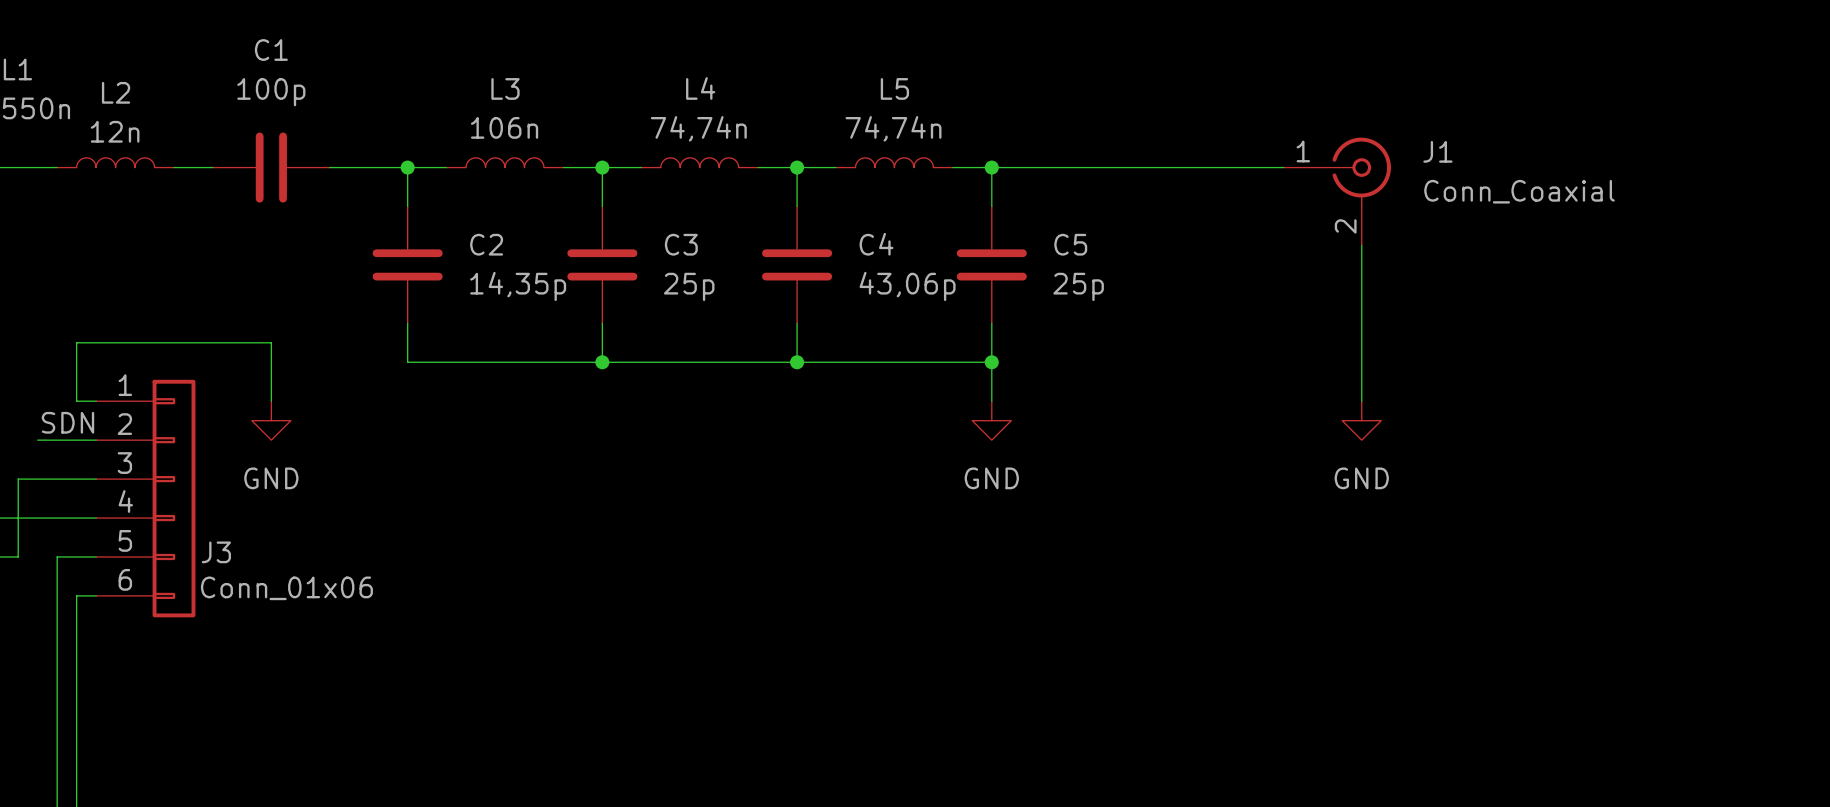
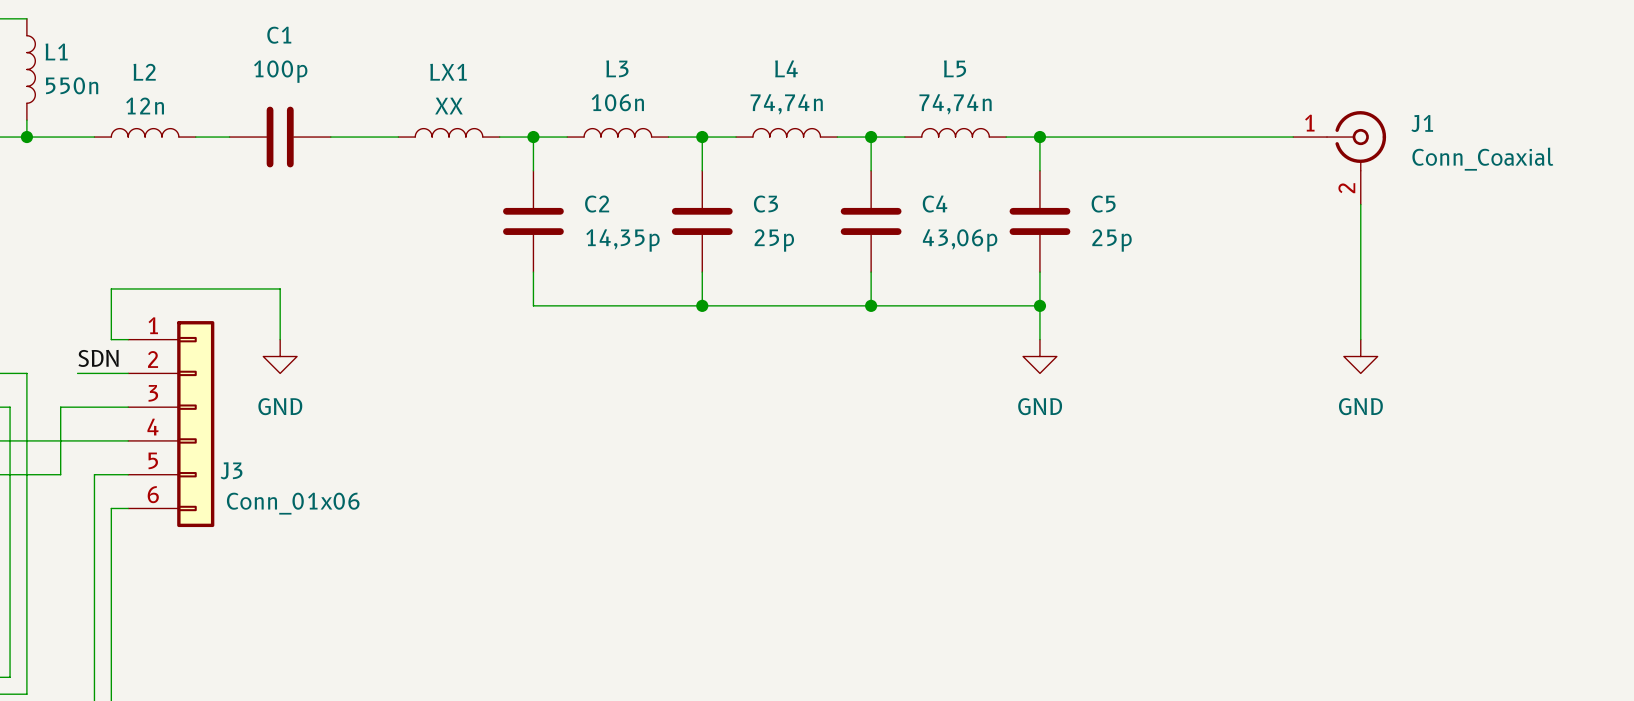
LX1: none -> XX (449, 132)
L3 position: (505, 162) -> (617, 132)
L4 position: (699, 162) -> (786, 132)
L5 position: (894, 162) -> (955, 132)
junction: (407, 167) -> none
wire: (446, 167) (407, 167) (407, 206) -> none
wire: none -> (499, 137) (533, 137) (533, 170)
junction position: (602, 167) -> (533, 137)
wire: (641, 167) (602, 167) (602, 206) -> none
wire: none -> (668, 137) (702, 137) (702, 170)
junction position: (797, 167) -> (702, 137)
wire: (836, 167) (797, 167) (797, 206) -> none
wire: none -> (837, 137) (871, 137) (871, 170)
junction position: (991, 167) -> (871, 137)
wire: (1108, 167) (991, 167) (991, 206) -> none
wire: none -> (1039, 137) (1039, 170)
junction: none -> (1039, 137)
wire: none -> (1158, 137) (1293, 137)
J1 position: (1337, 191) -> (1339, 157)
wire: (1361, 245) (1361, 401) -> (1360, 204) (1360, 339)
C2 position: (407, 264) -> (533, 221)
C3 position: (602, 264) -> (702, 221)
C4 position: (797, 264) -> (871, 221)
C5 position: (991, 264) -> (1039, 221)
wire: (407, 323) (407, 362) (563, 362) -> (533, 272) (533, 305)
wire: (602, 323) (602, 362) -> (702, 272) (702, 305)
wire: (797, 323) (797, 362) -> (871, 272) (871, 305)
wire: (991, 323) (991, 401) -> (1039, 272) (1039, 339)
junction: (602, 362) -> none
junction position: (797, 362) -> (702, 305)
wire: none -> (904, 305) (1039, 305)
junction position: (991, 362) -> (871, 305)
junction: none -> (1039, 305)
power symbol: GND (991, 420) -> none
power symbol: none -> GND (1039, 356)
power symbol: GND (1361, 420) -> none
power symbol: none -> GND (1360, 356)

